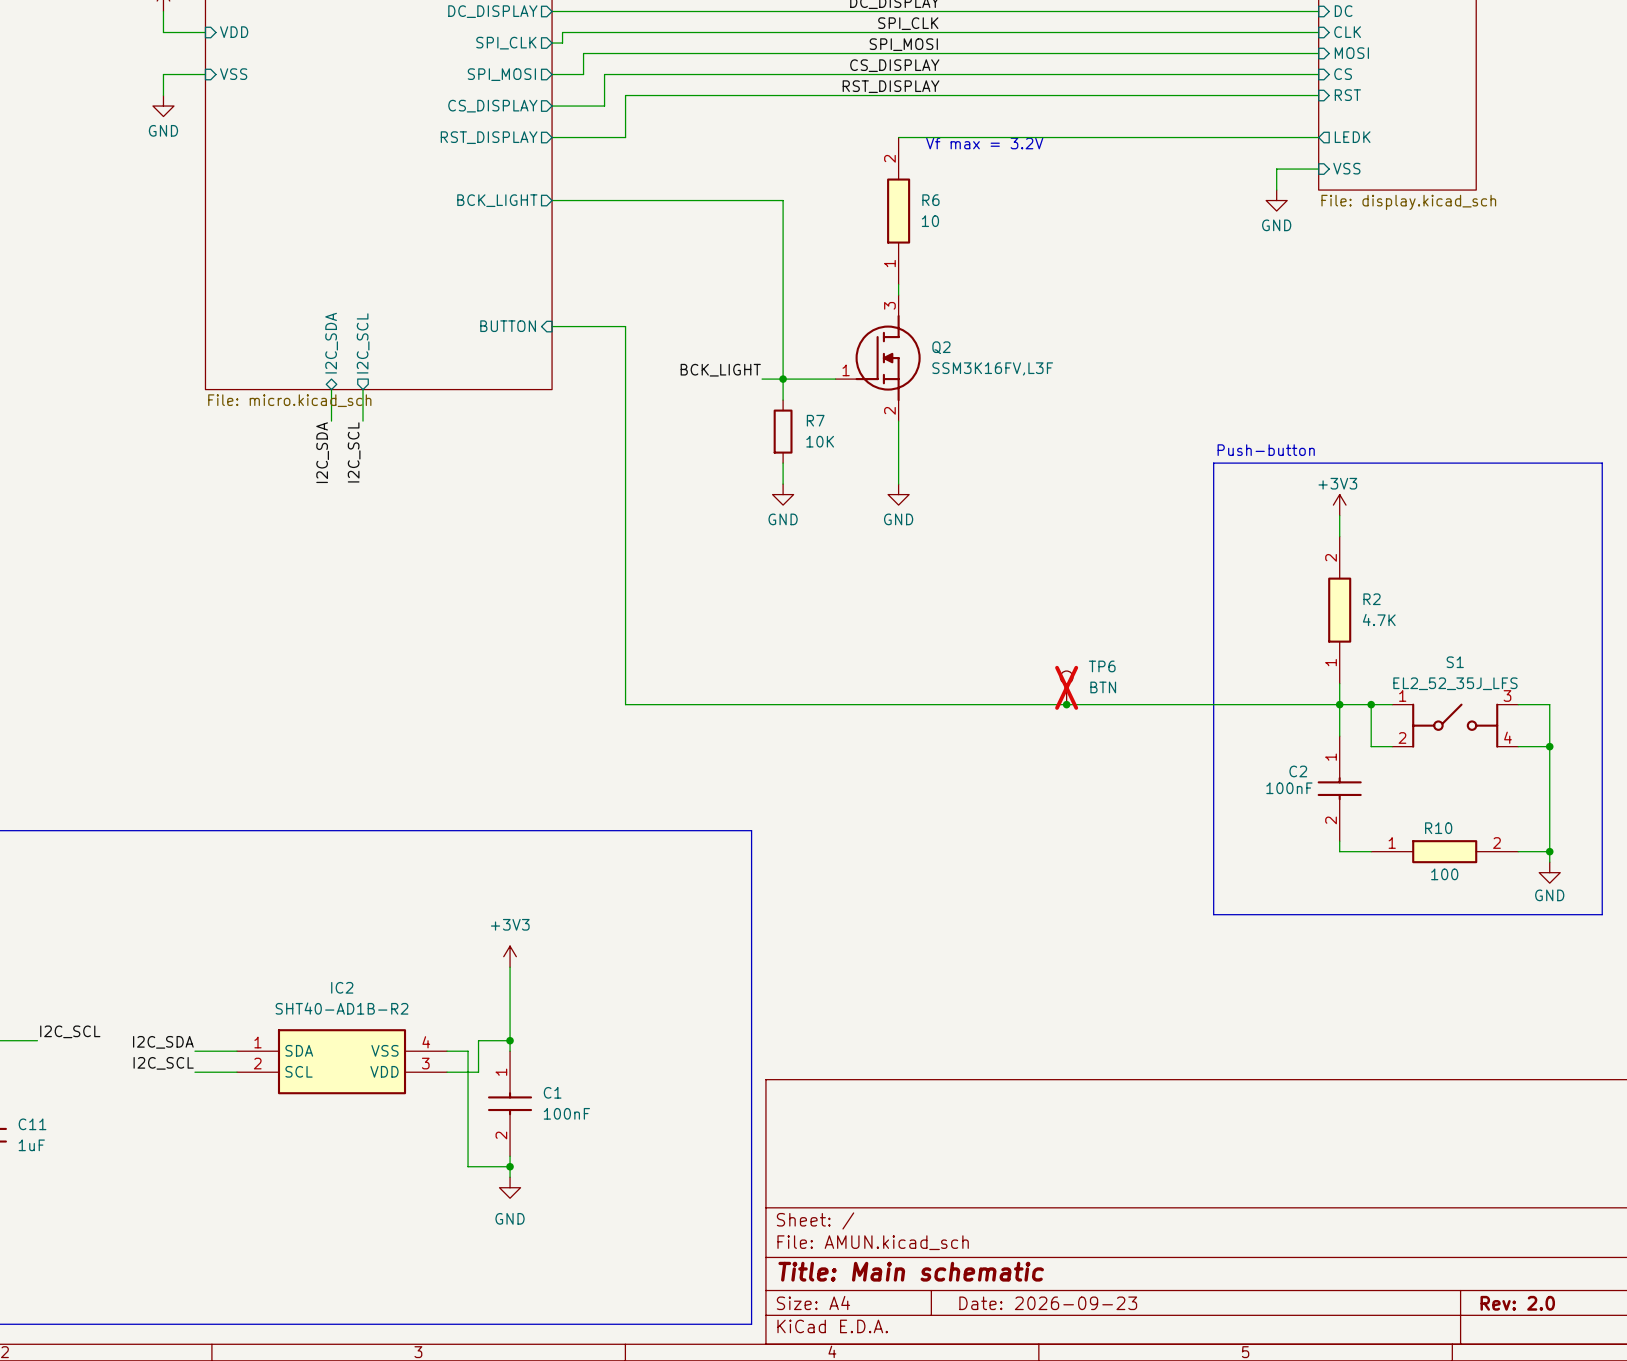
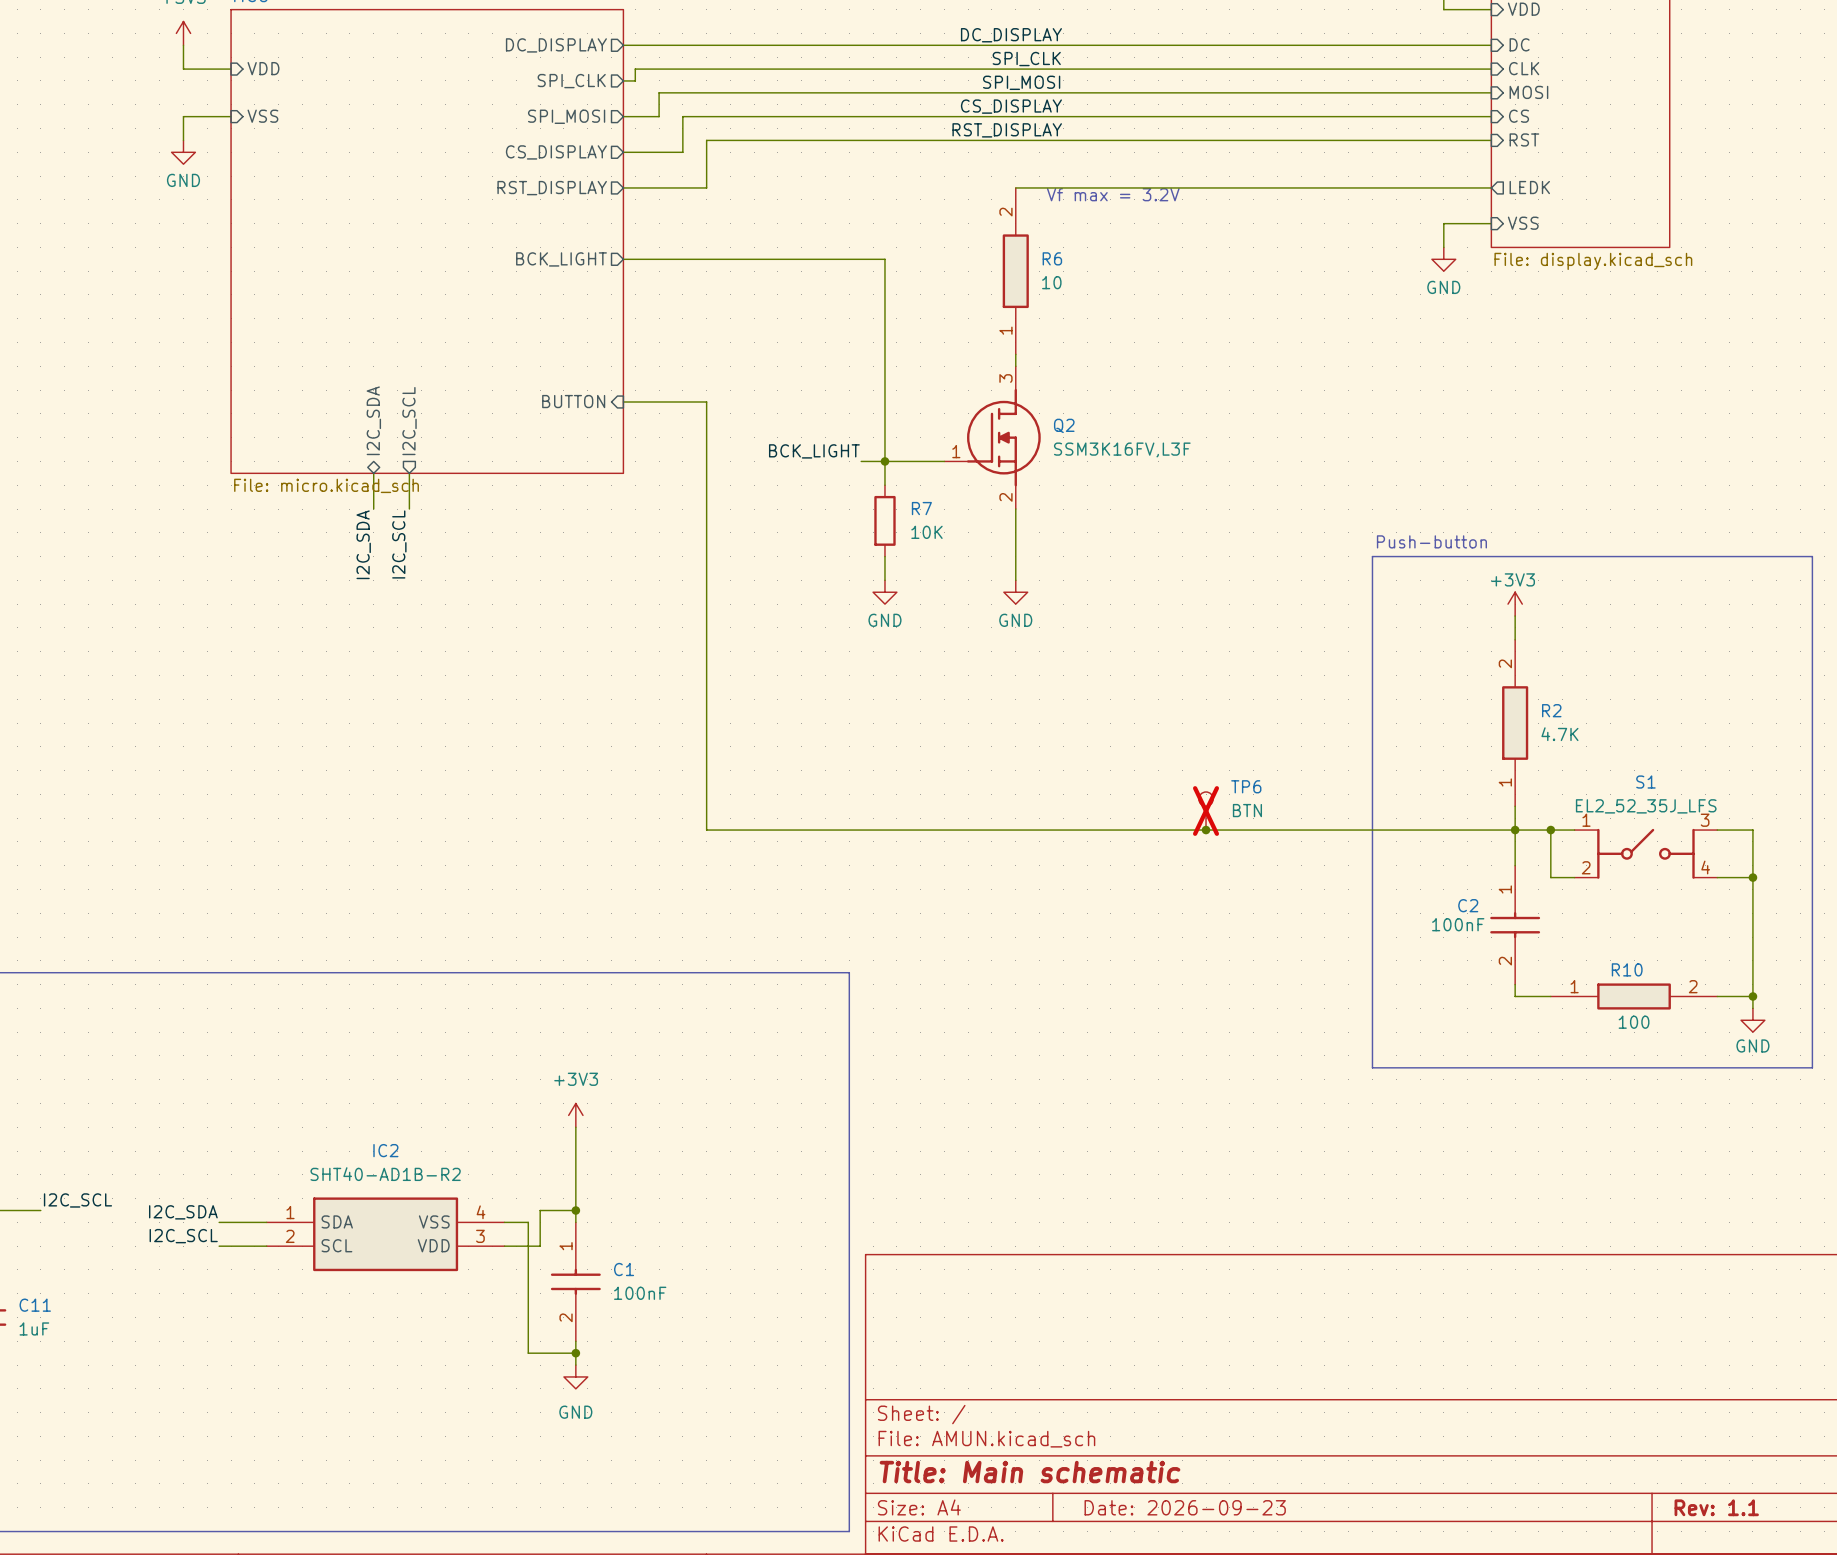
title block: Rev: 2.0 (1517, 1303) -> Rev: 1.1 (1716, 1507)

